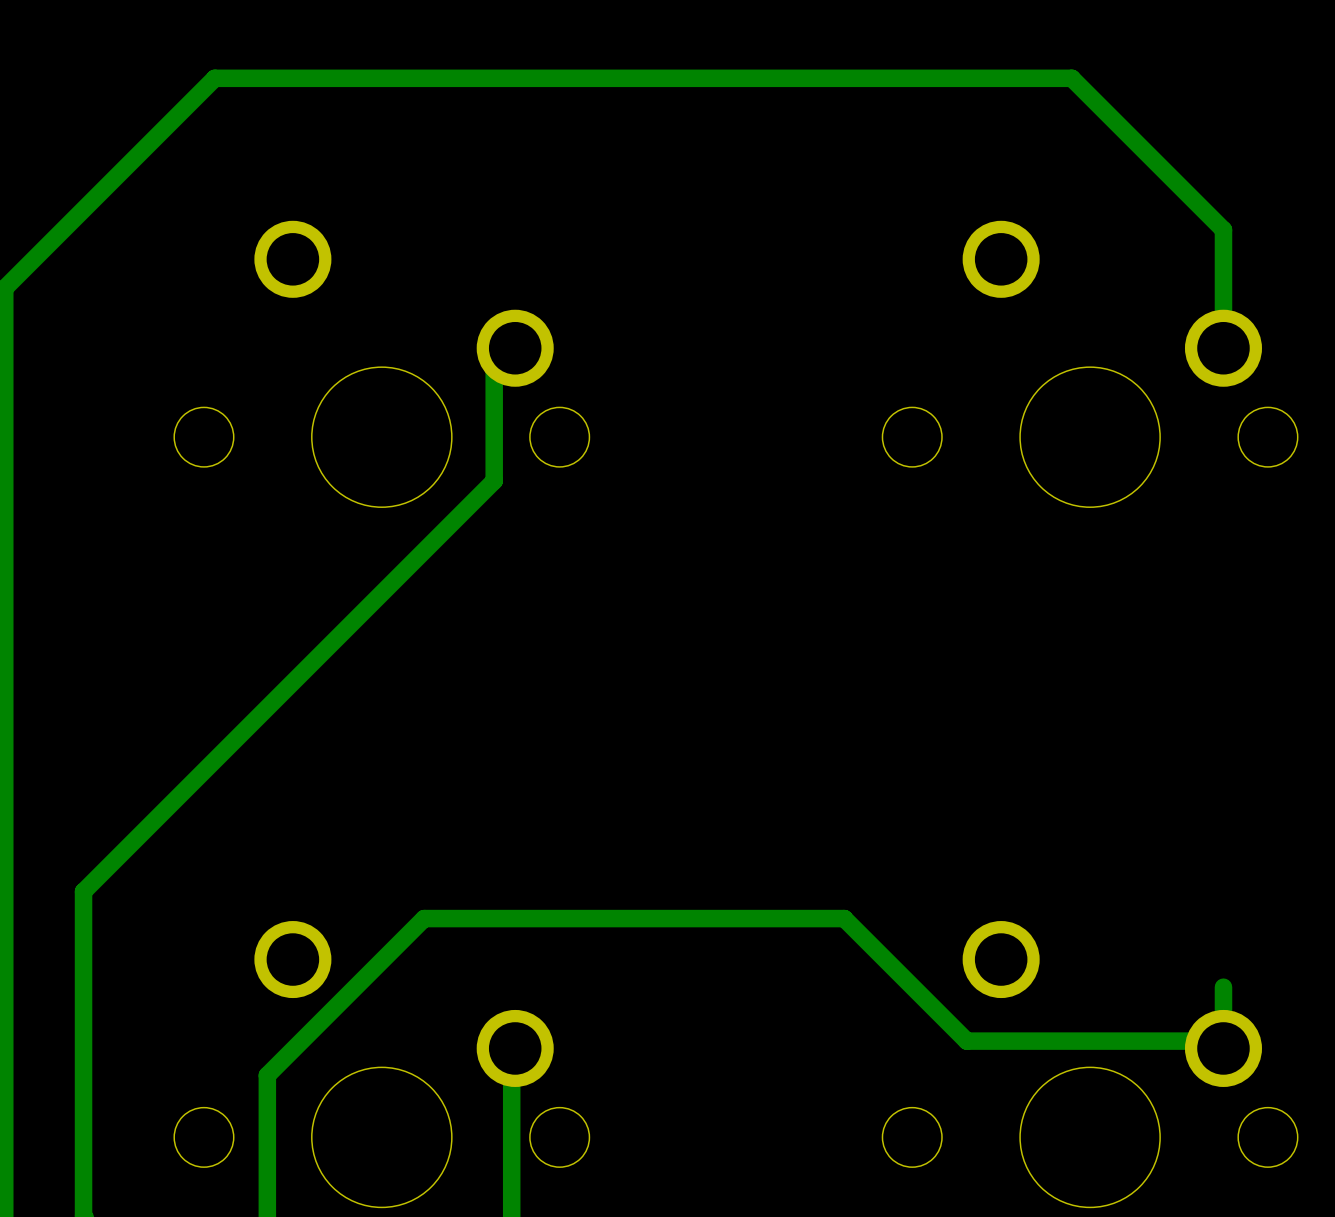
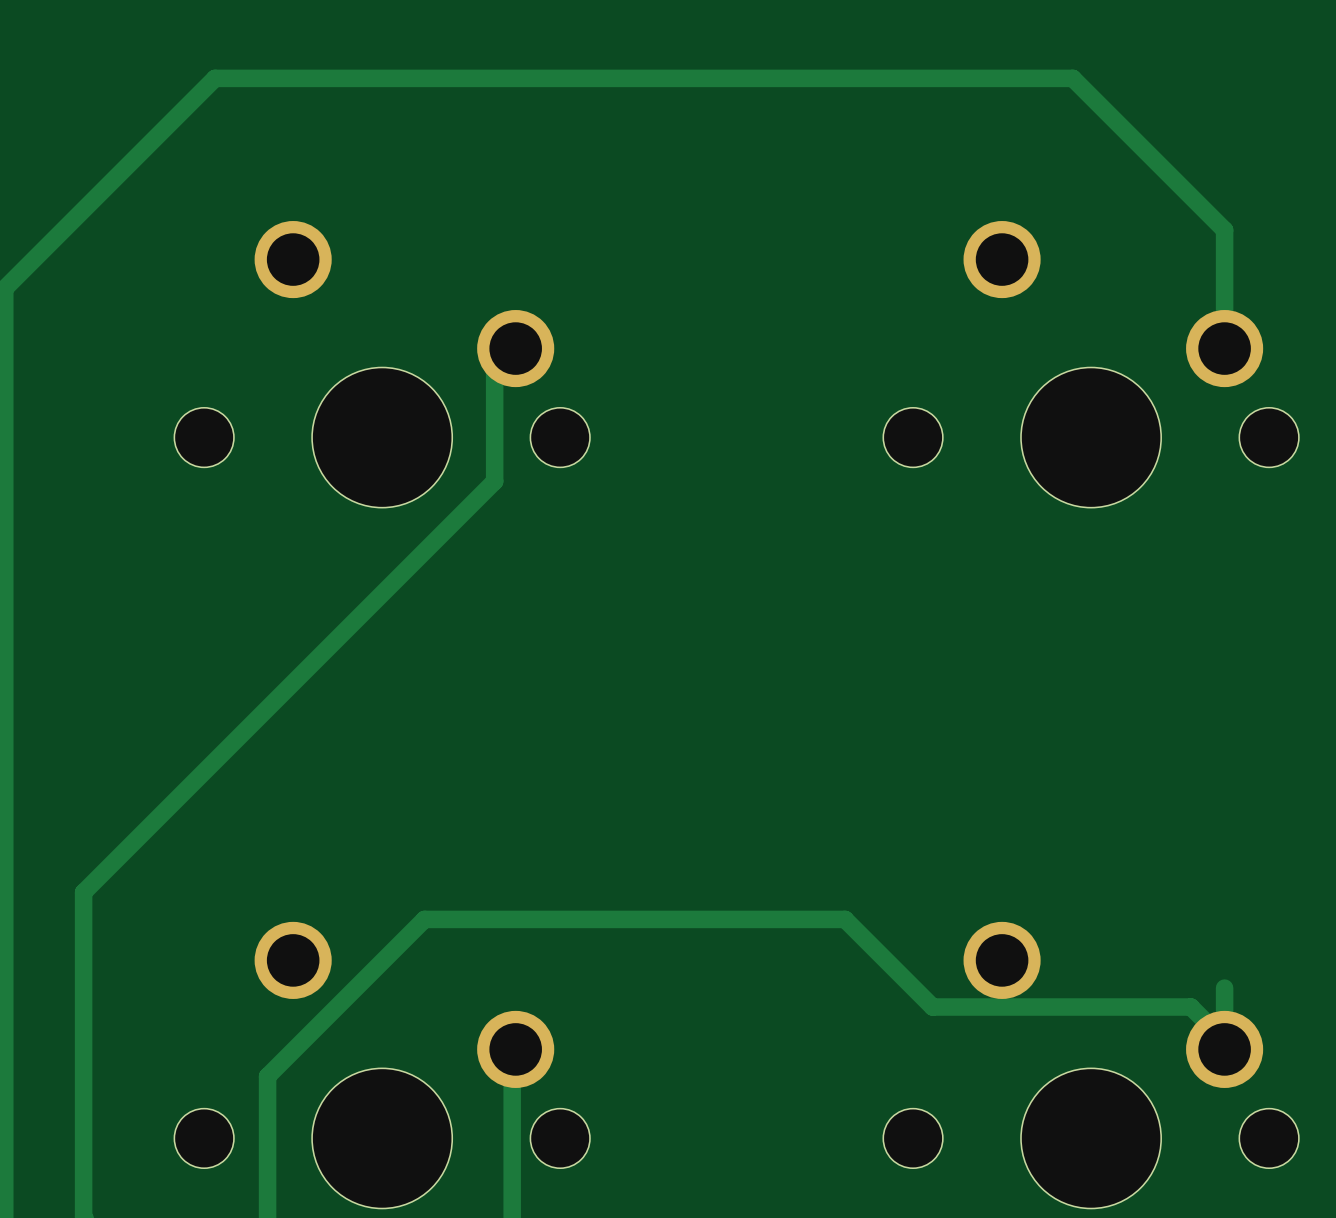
track: (931, 1006) (966, 1041) (1223, 1039) -> (932, 1007) (1190, 1007) (1224, 1040)

